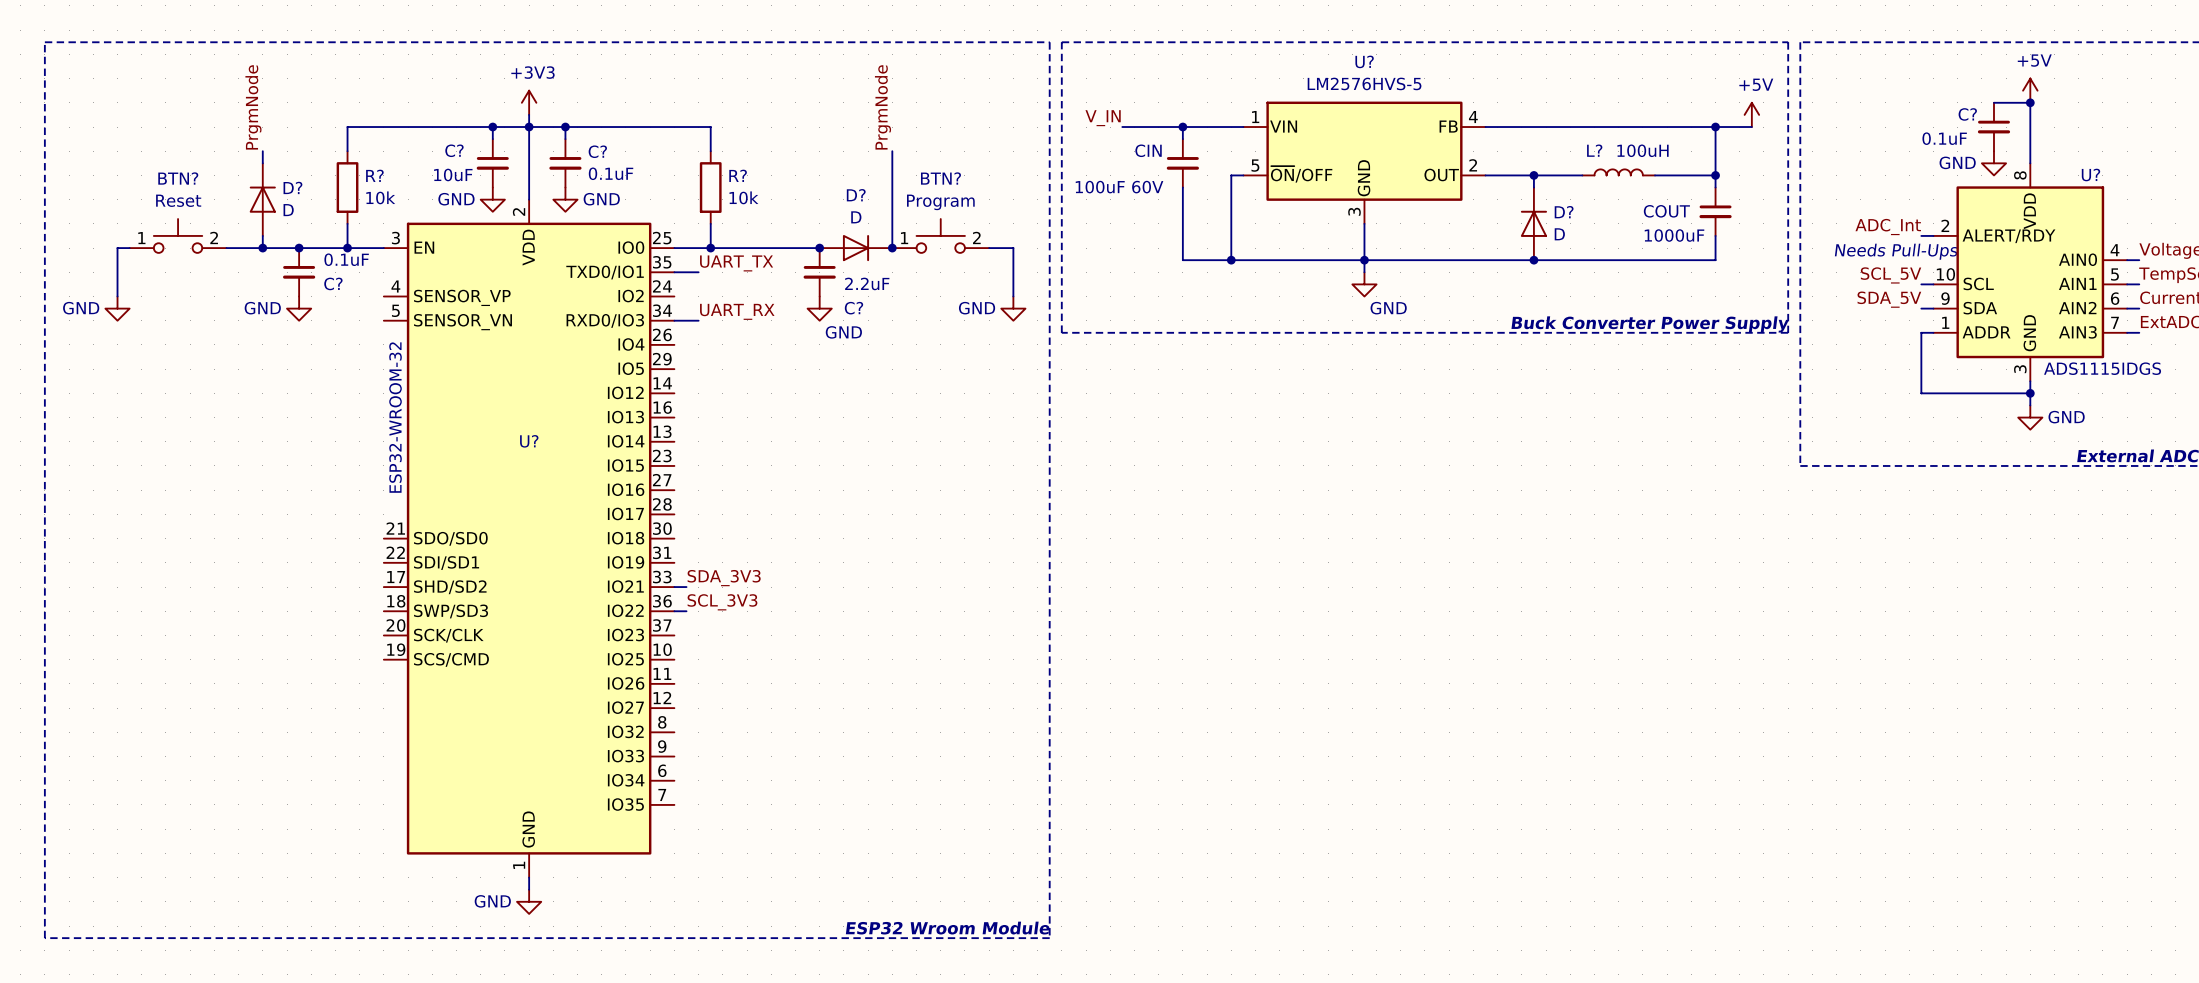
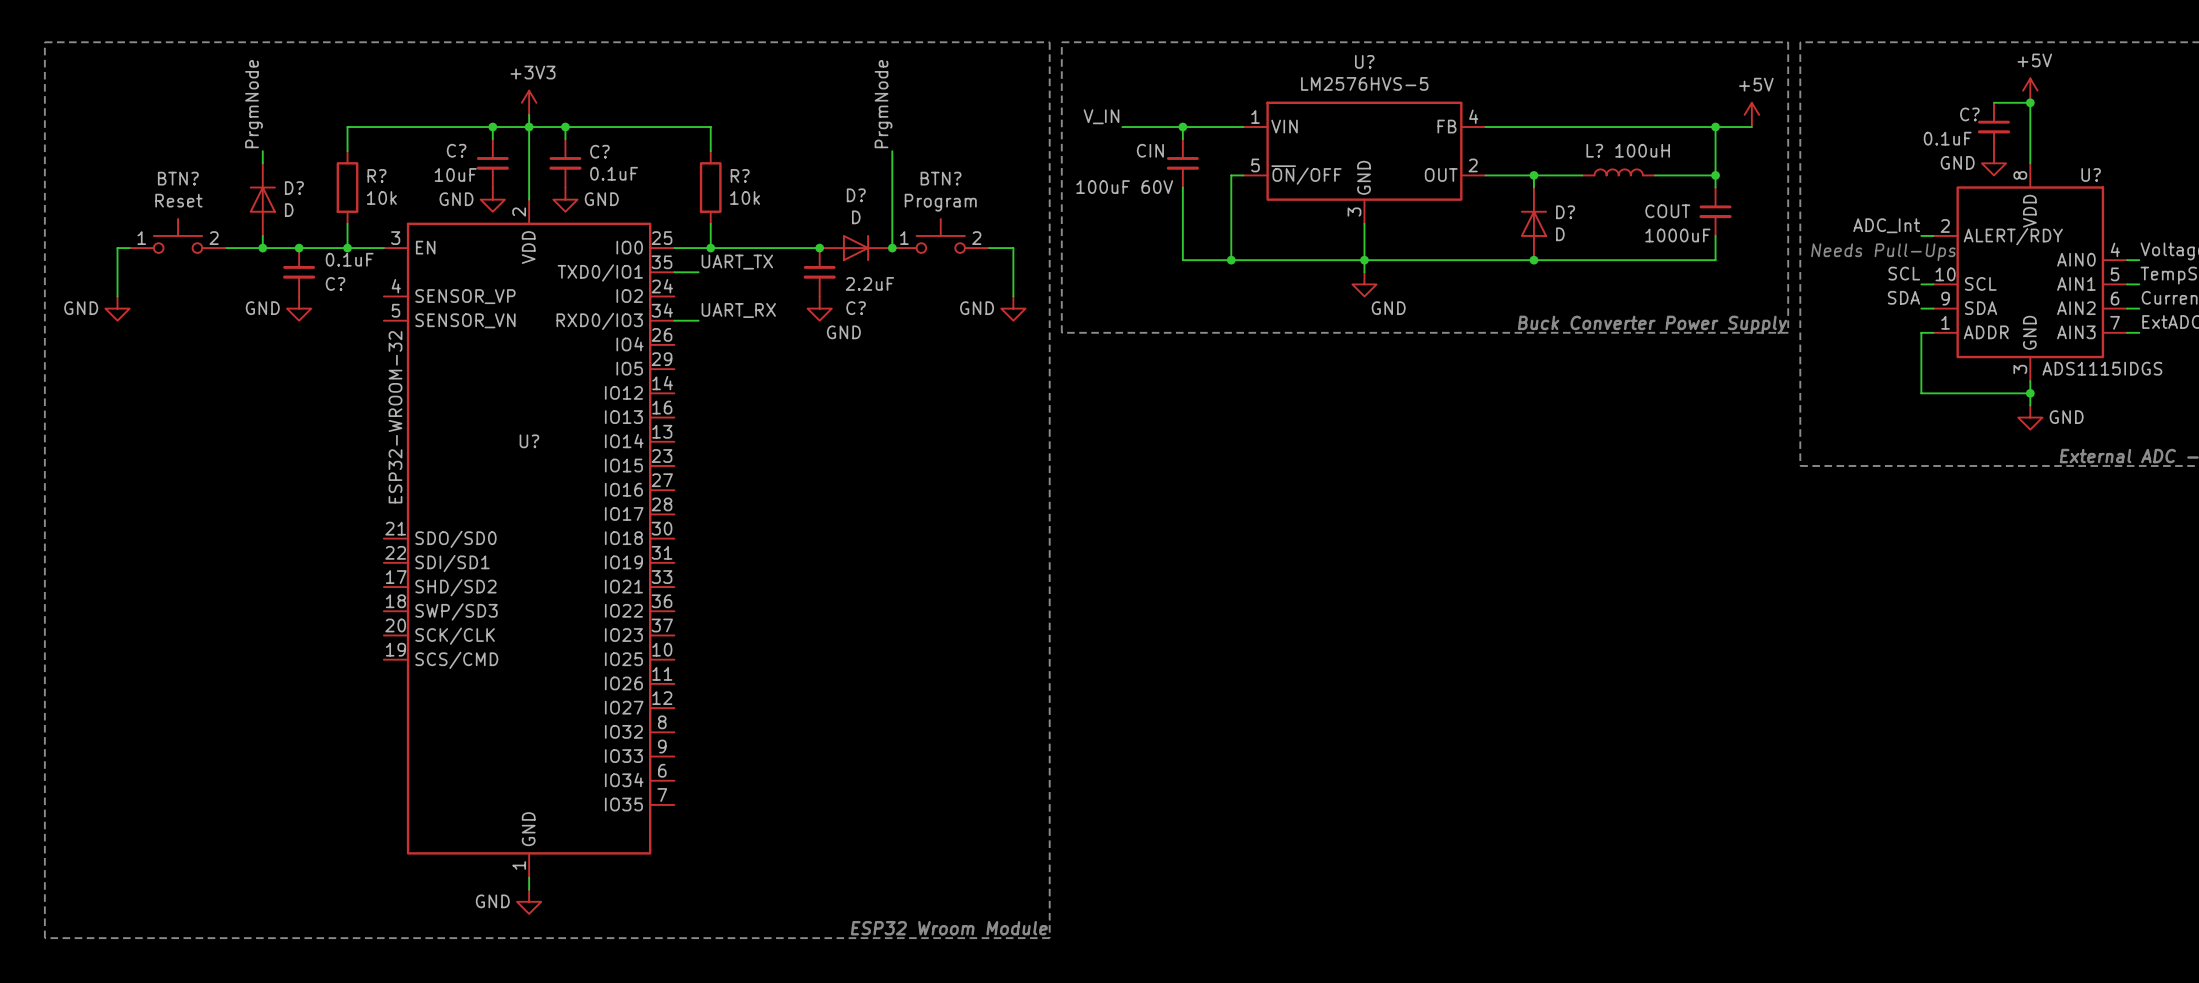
label: SCL_5V (1891, 275) -> SCL (1904, 273)
label: SDA_5V (1889, 299) -> SDA (1903, 297)
label: SDA_3V3 (724, 578) -> none
wire: (674, 587) (686, 587) -> none
label: SCL_3V3 (722, 602) -> none
wire: (674, 611) (686, 611) -> none

